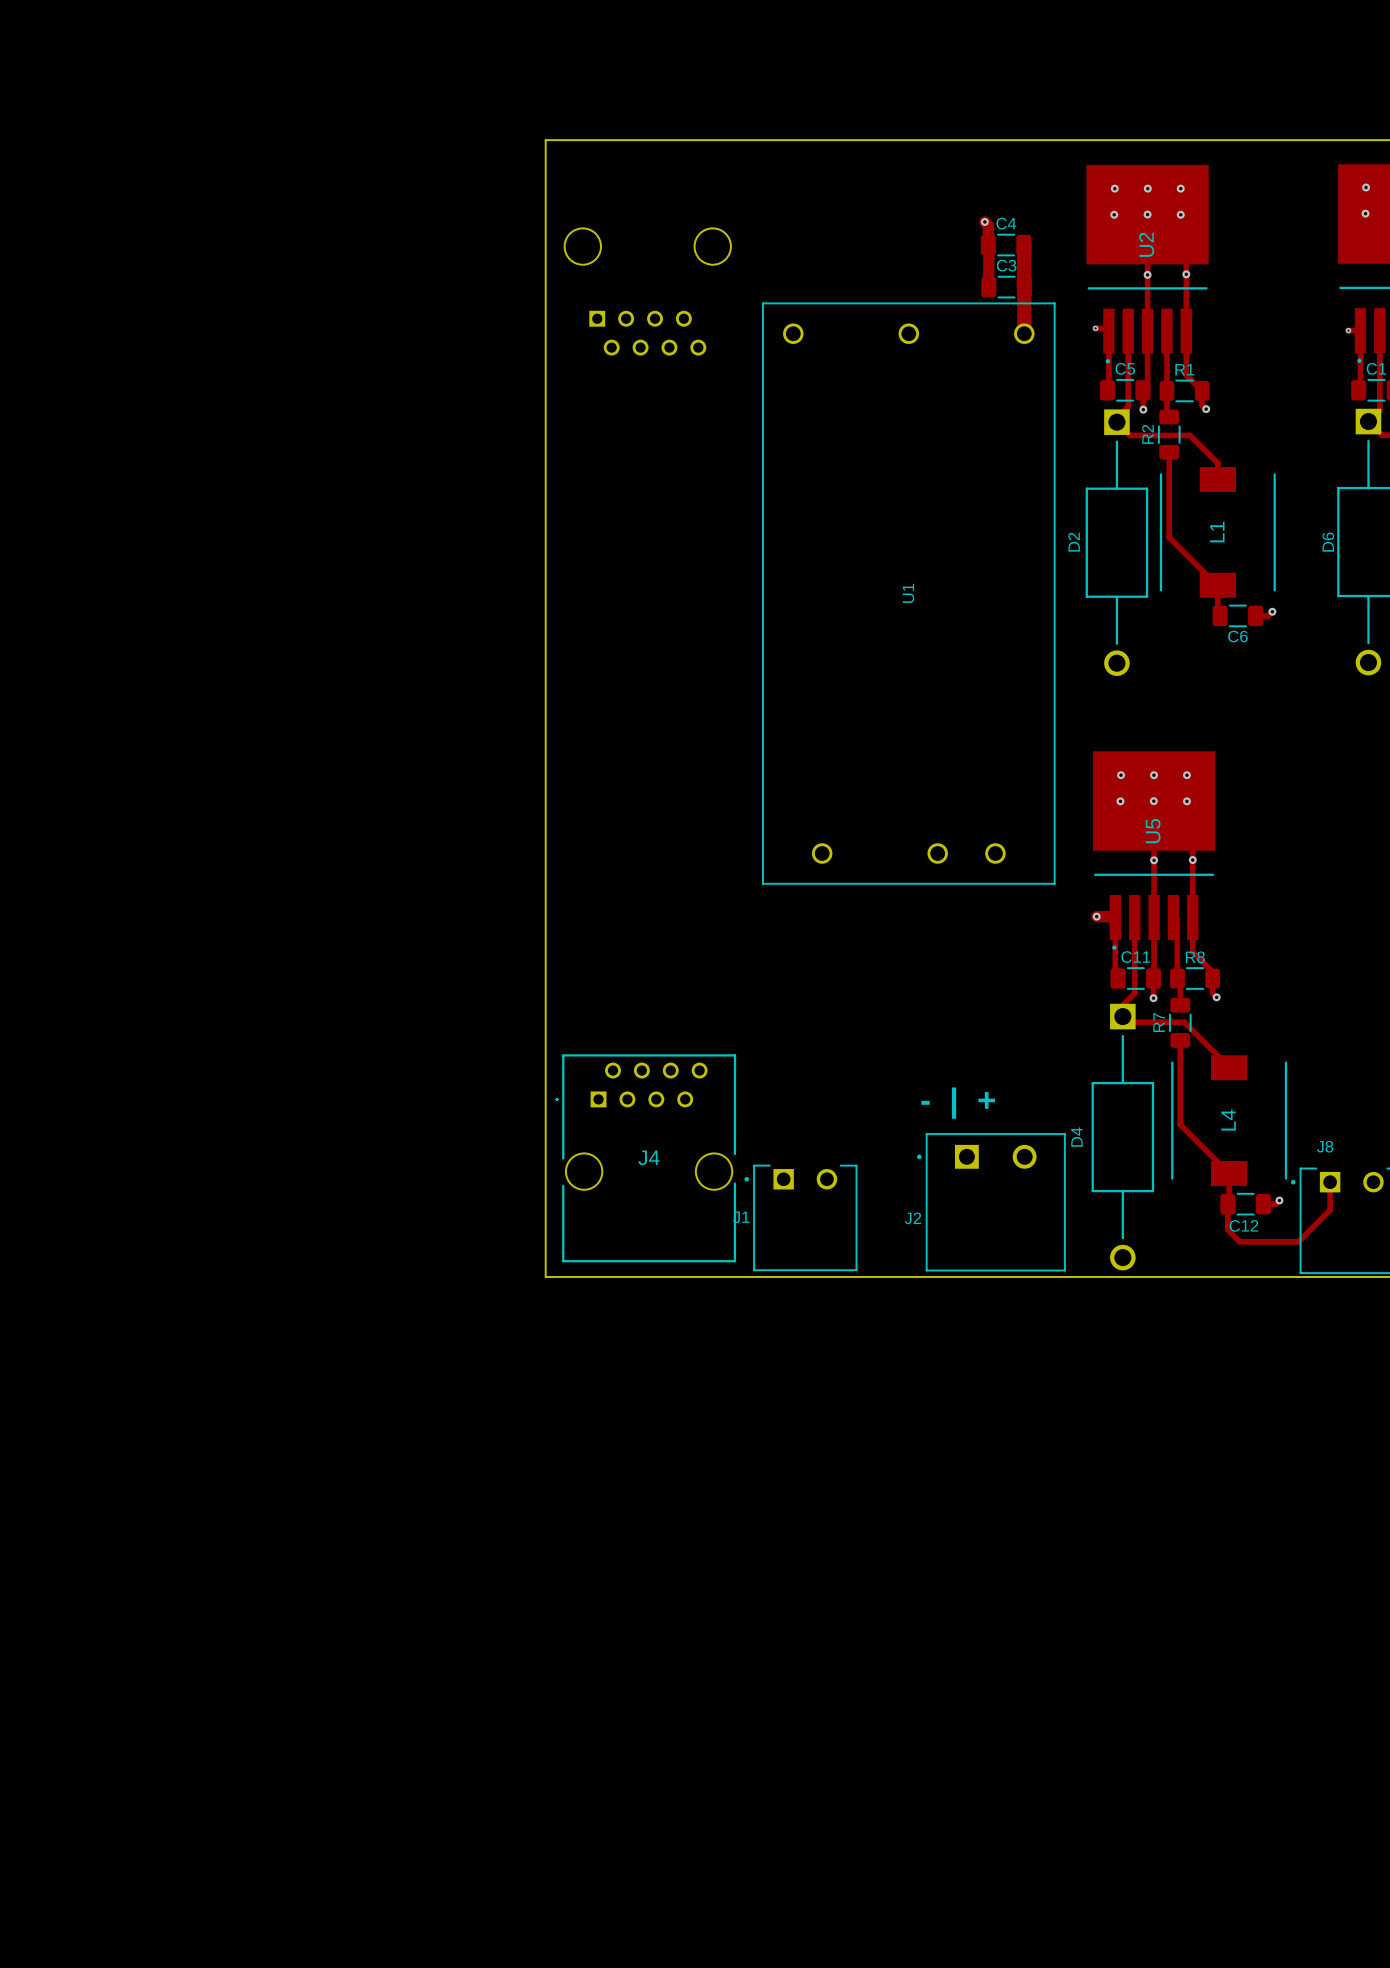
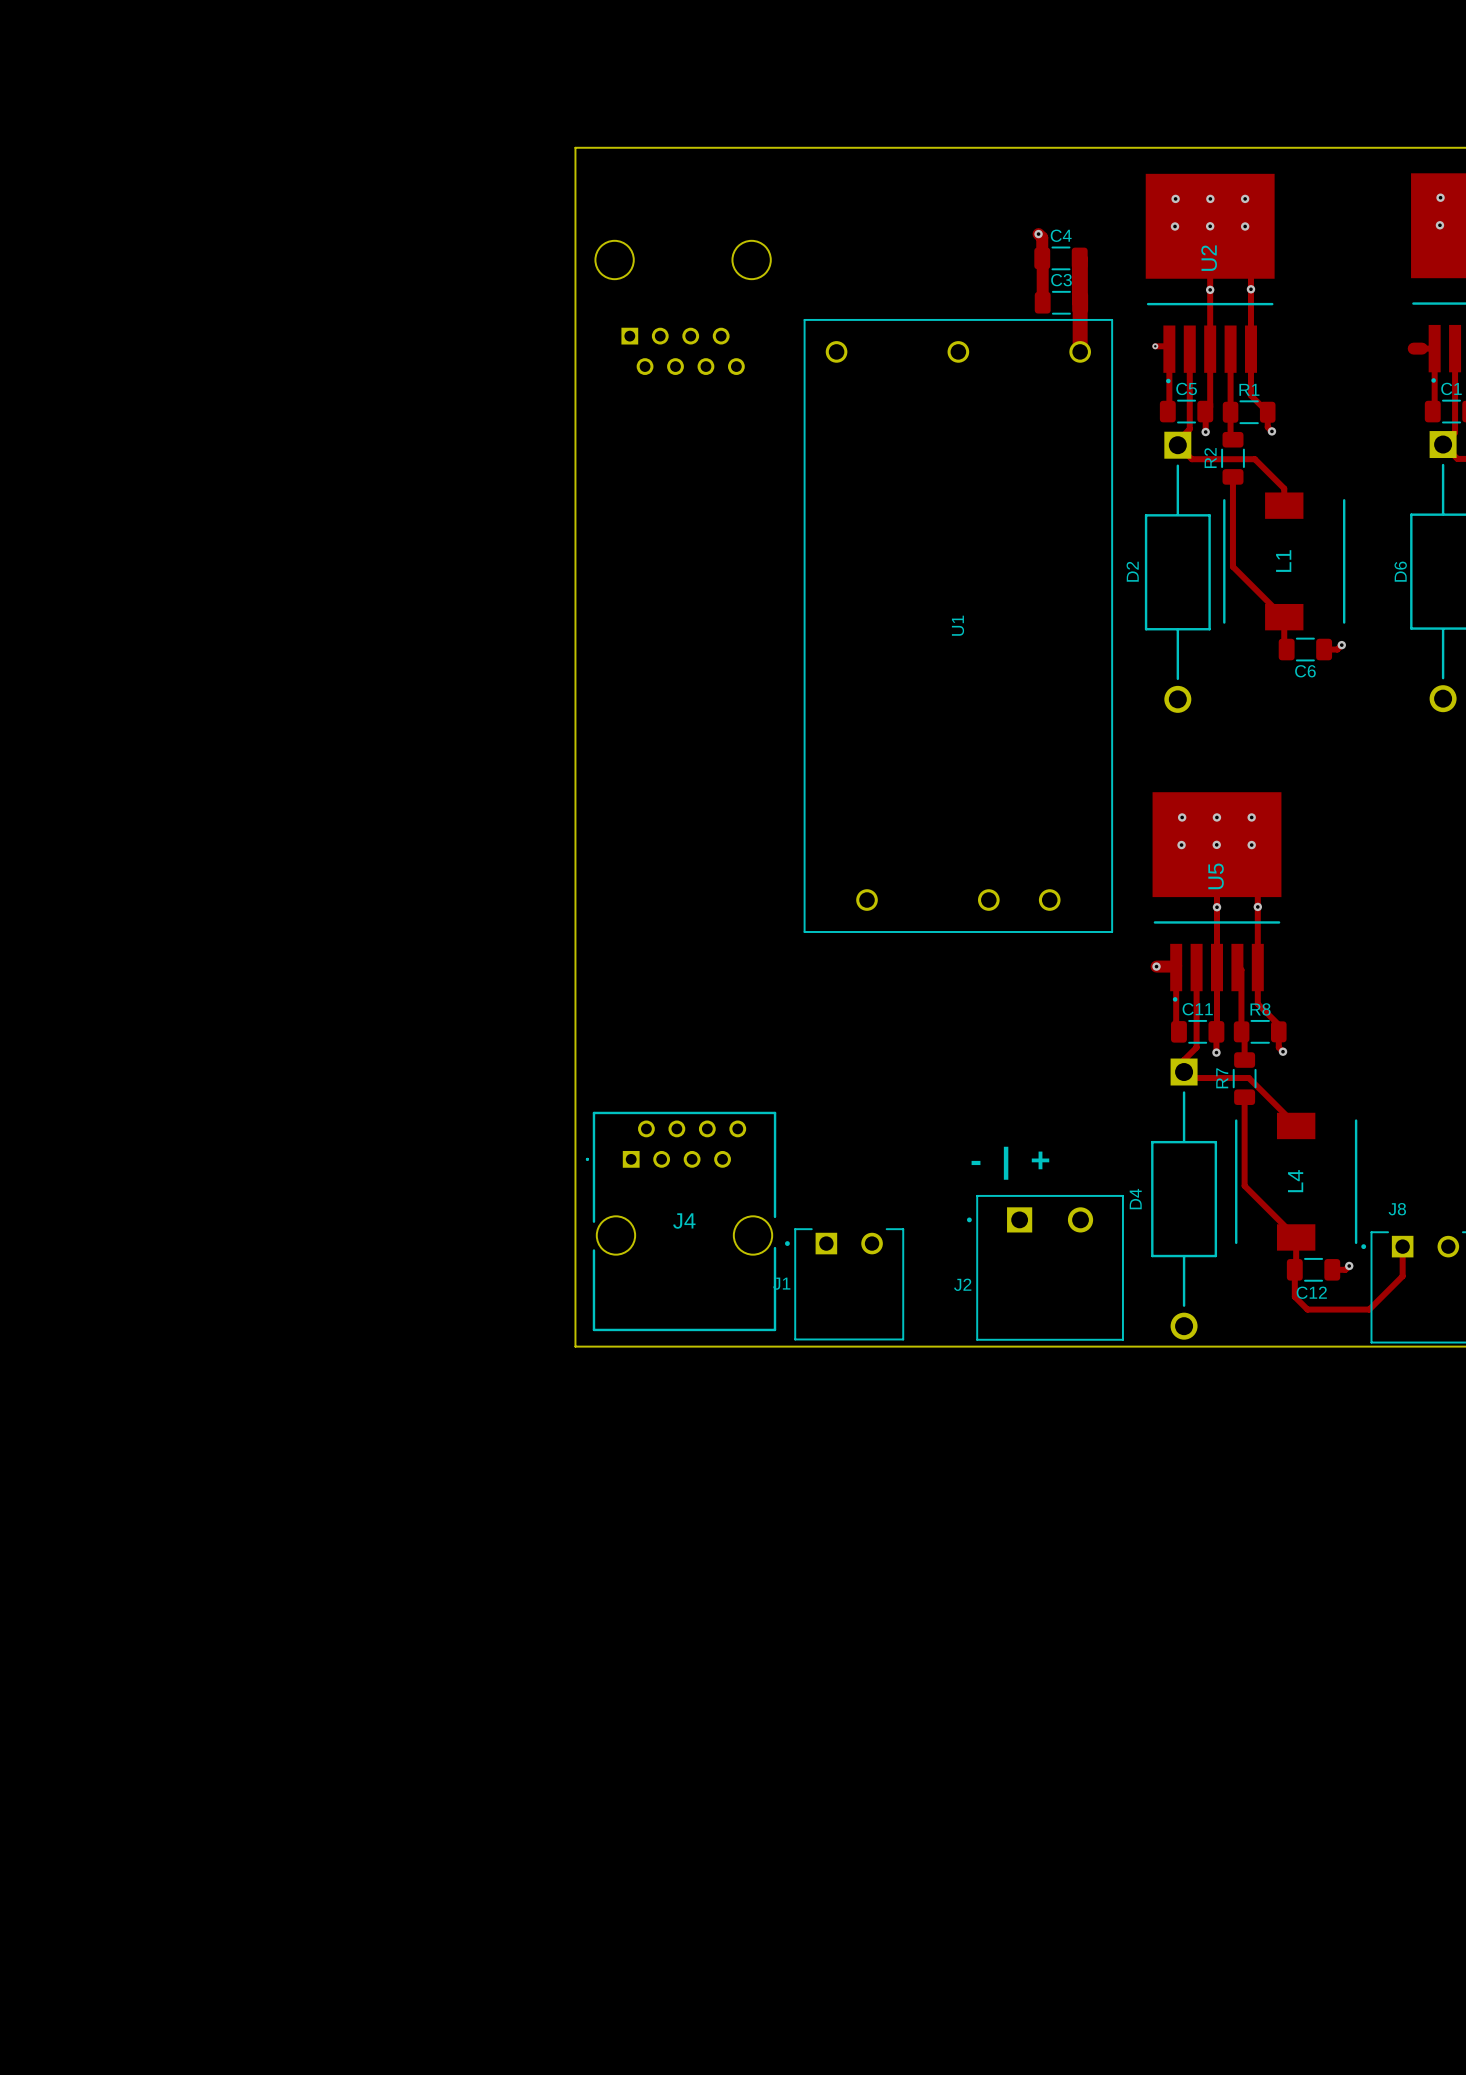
track: none -> (1413, 348) (1421, 348)
via: (1348, 330) -> none

